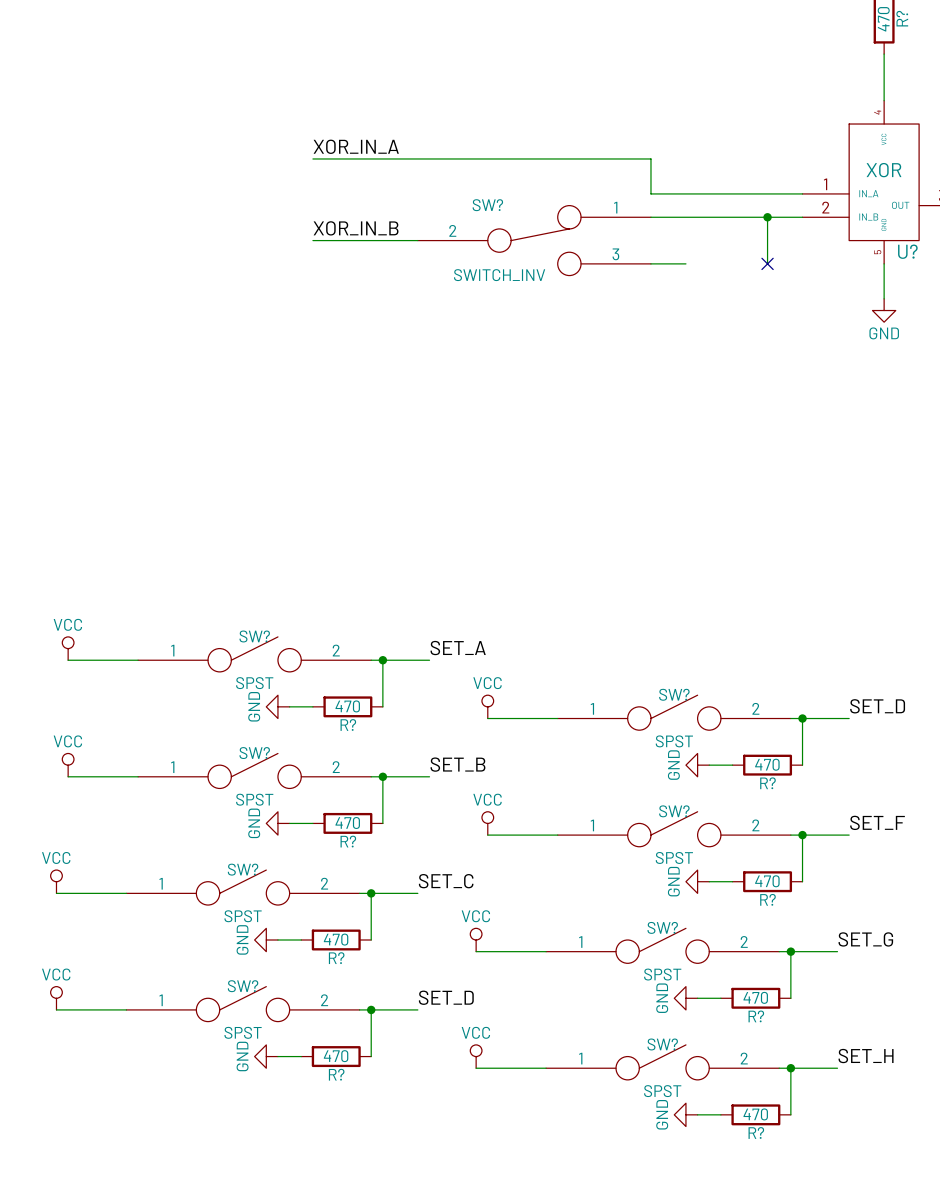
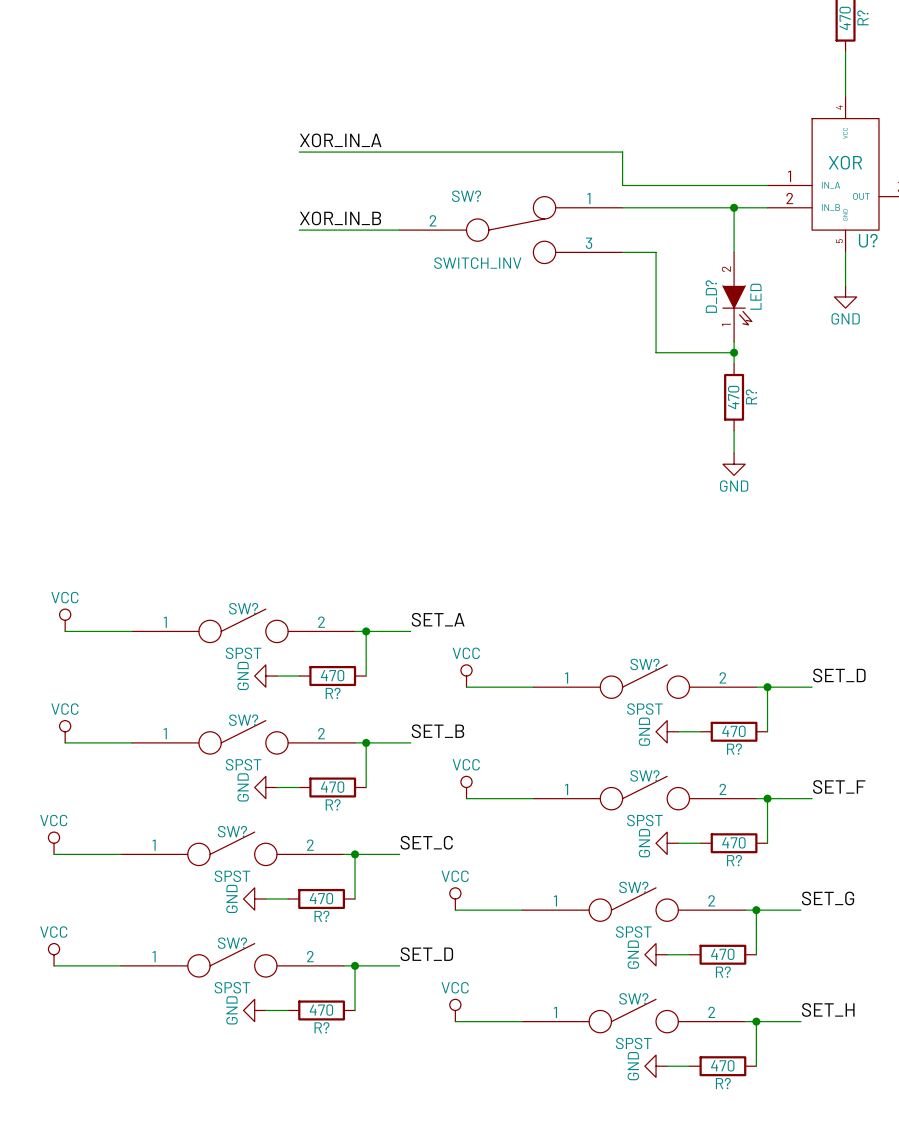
wire: none -> (656, 252) (656, 352) (734, 352)
no-connect mark: (767, 263) -> none
D_D?: none -> LED (737, 296)
wire: none -> (734, 341) (734, 363)
junction: none -> (734, 352)
R?: none -> 470 (734, 397)
wire: none -> (734, 430) (734, 453)
power symbol: none -> GND (734, 464)

